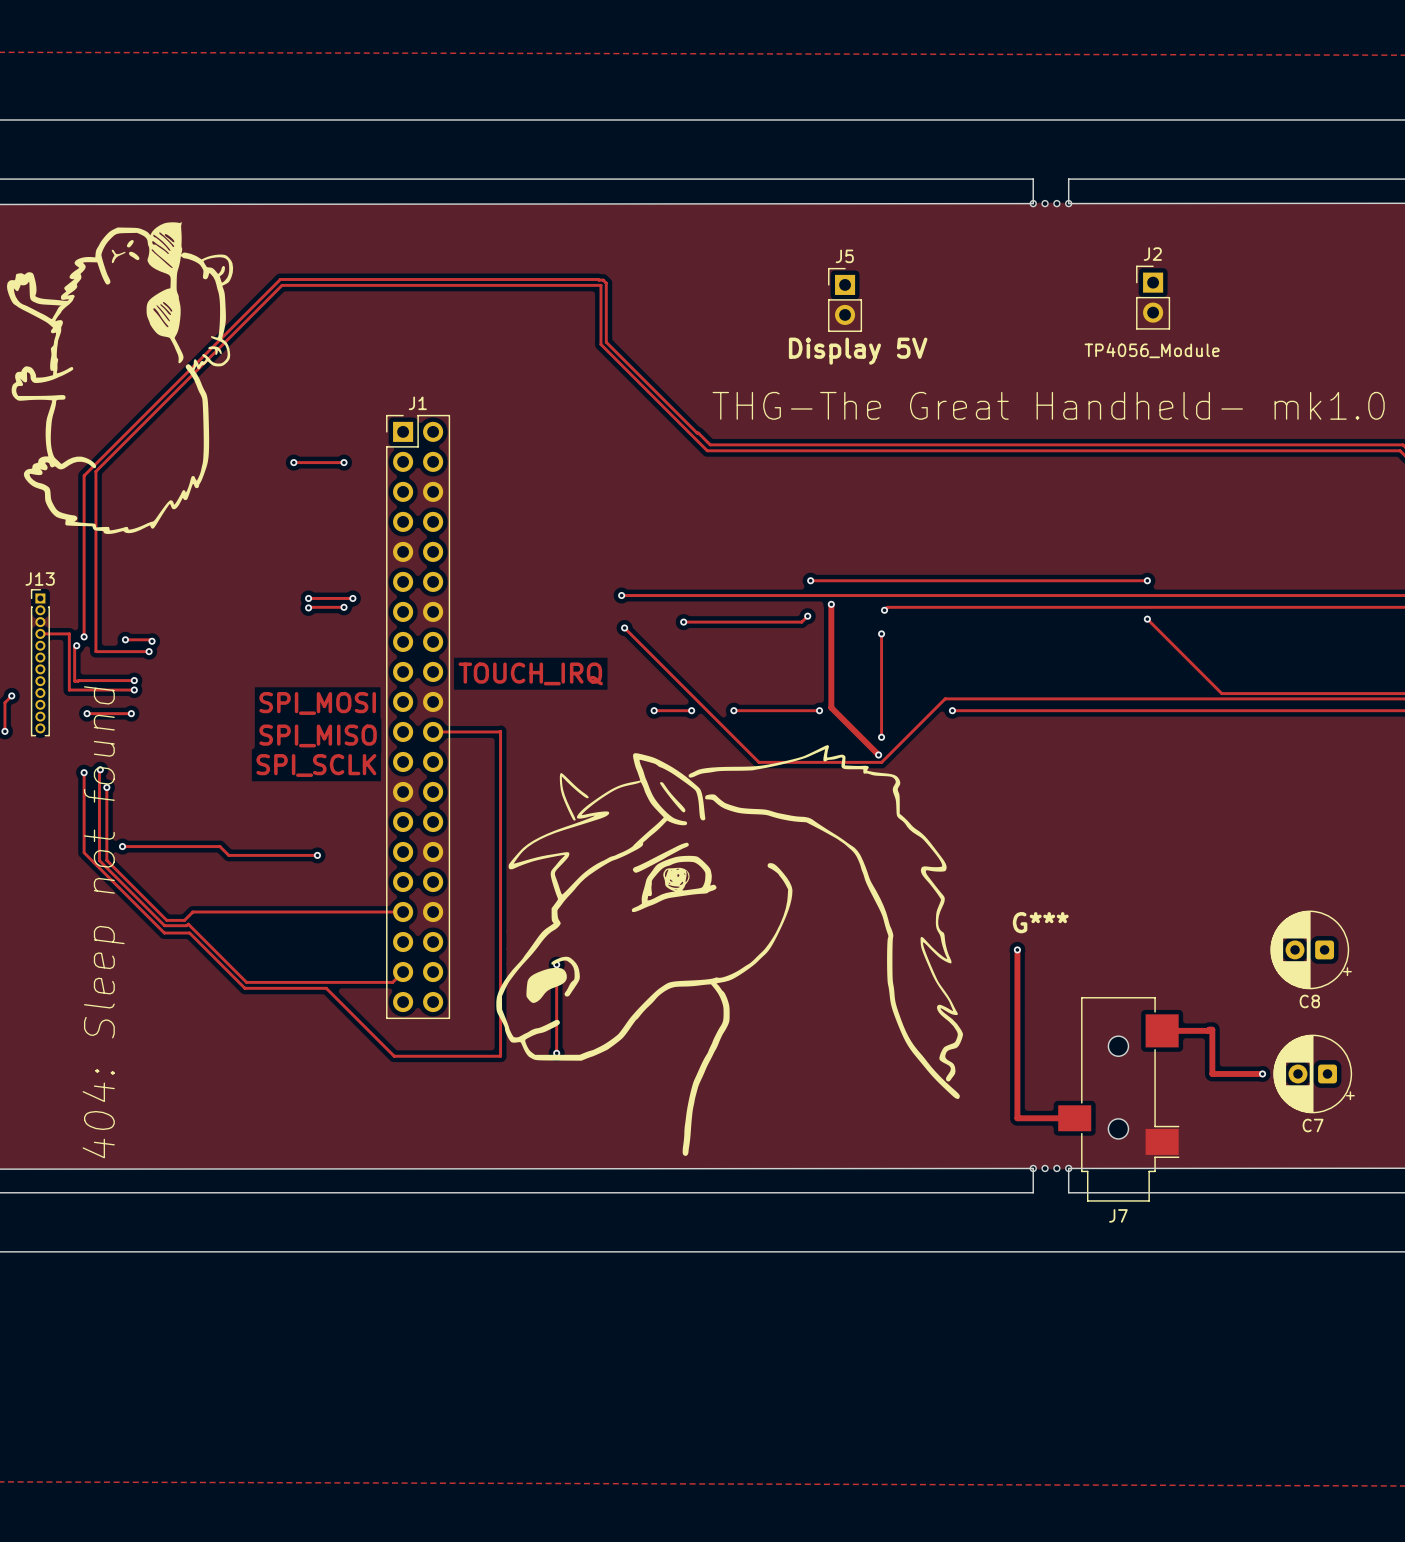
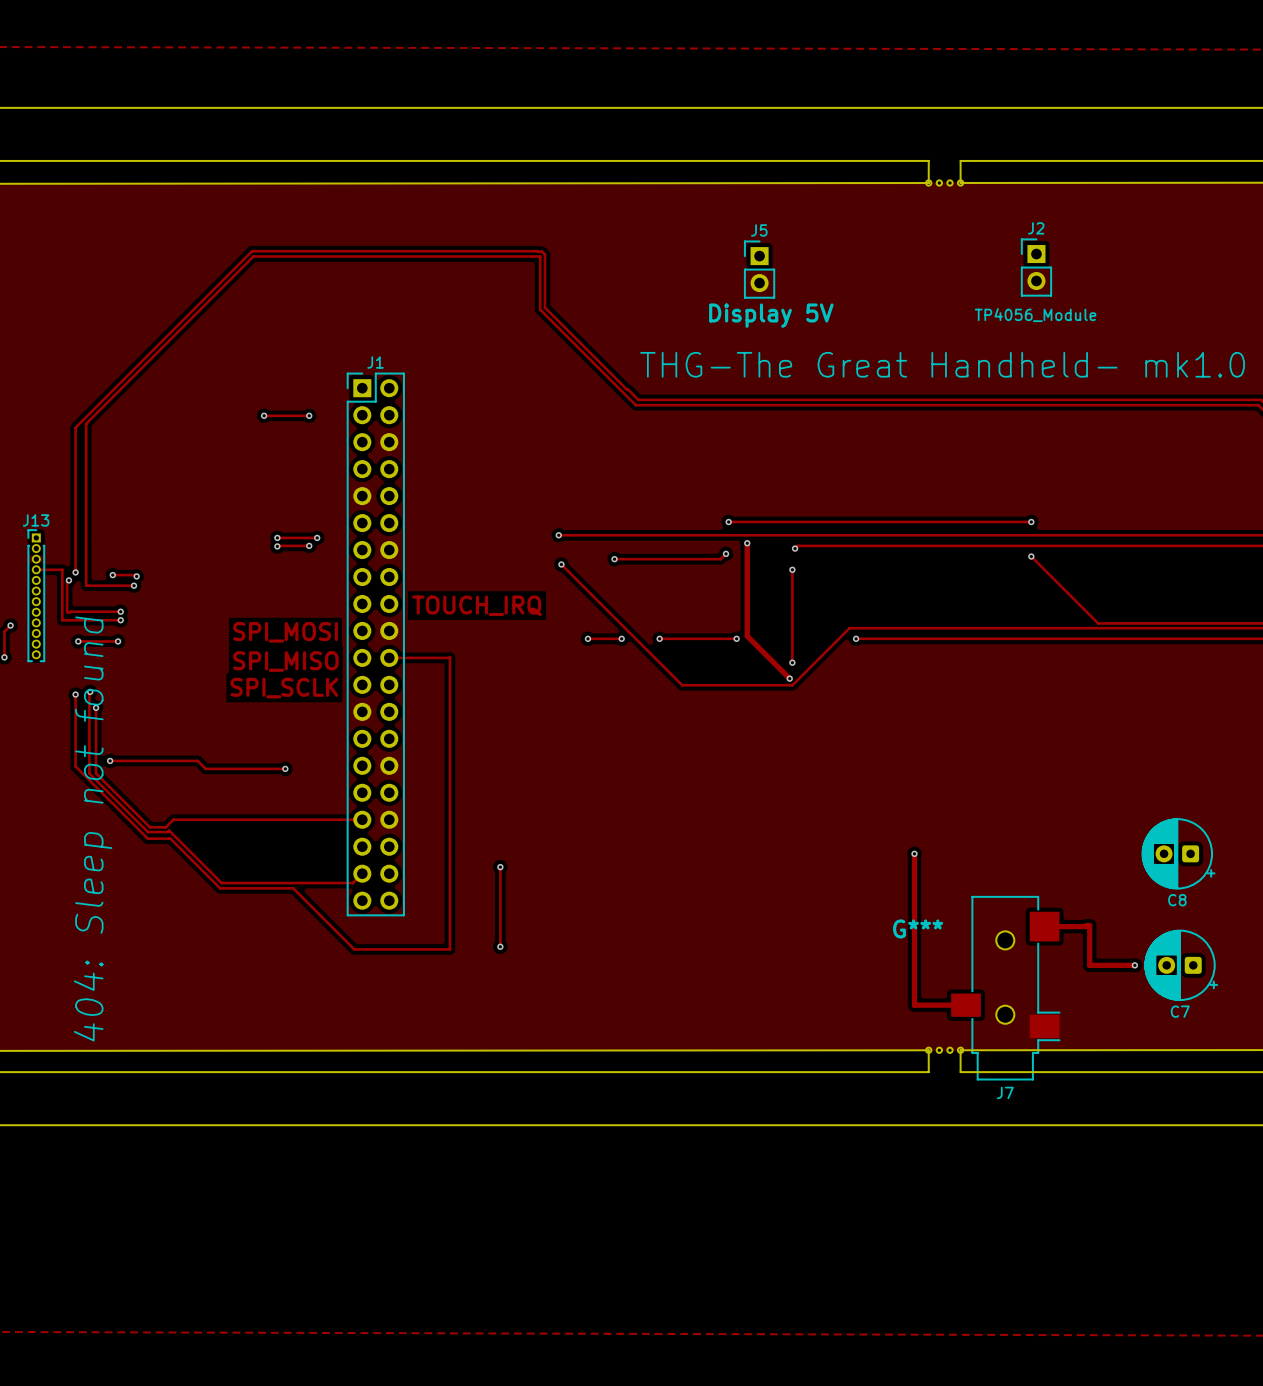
drawing: [6, 221, 234, 535] -> none
drawing: [496, 745, 963, 1156] -> none
G*** position: (1040, 922) -> (918, 928)

